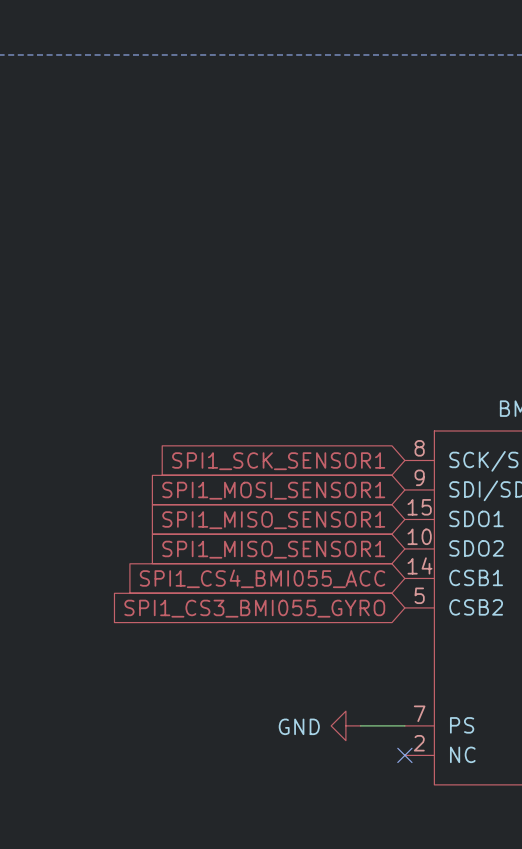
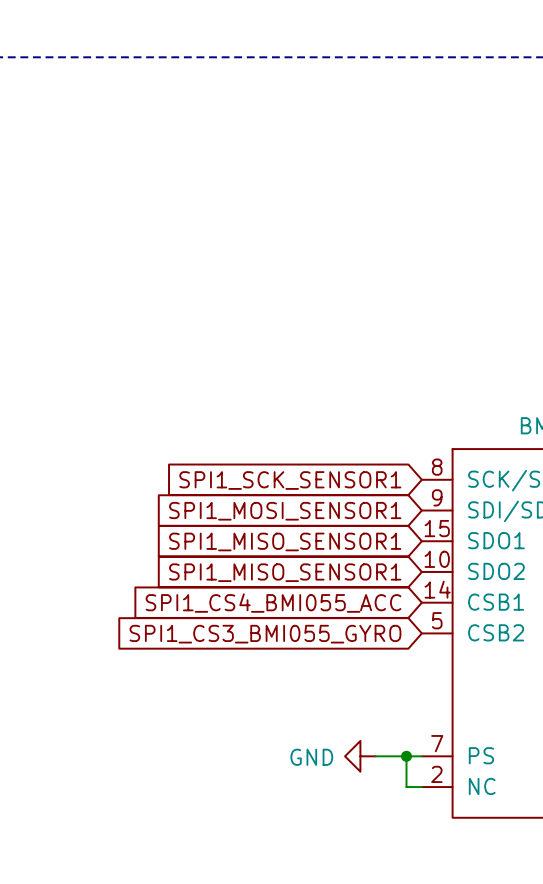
wire: none -> (406, 756) (406, 787) (421, 787)
junction: none -> (406, 756)
no-connect mark: (404, 755) -> none

